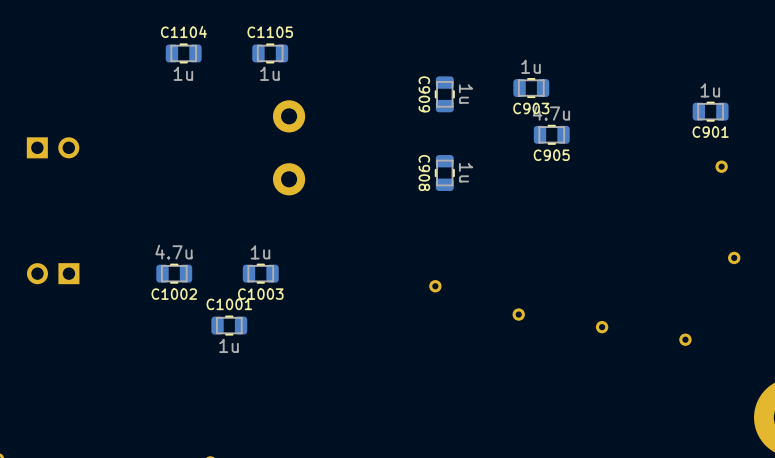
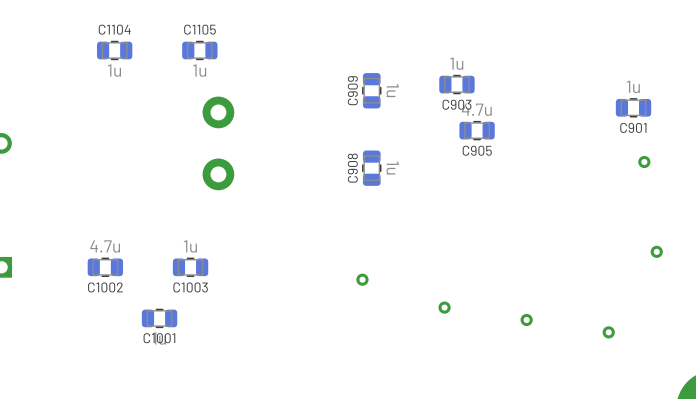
C909 name rotation: 0° (424, 94) -> 180° (352, 90)
C908 name rotation: 0° (424, 172) -> 180° (352, 168)
C1001 name position: C1001 (229, 304) -> C1001 (159, 338)

